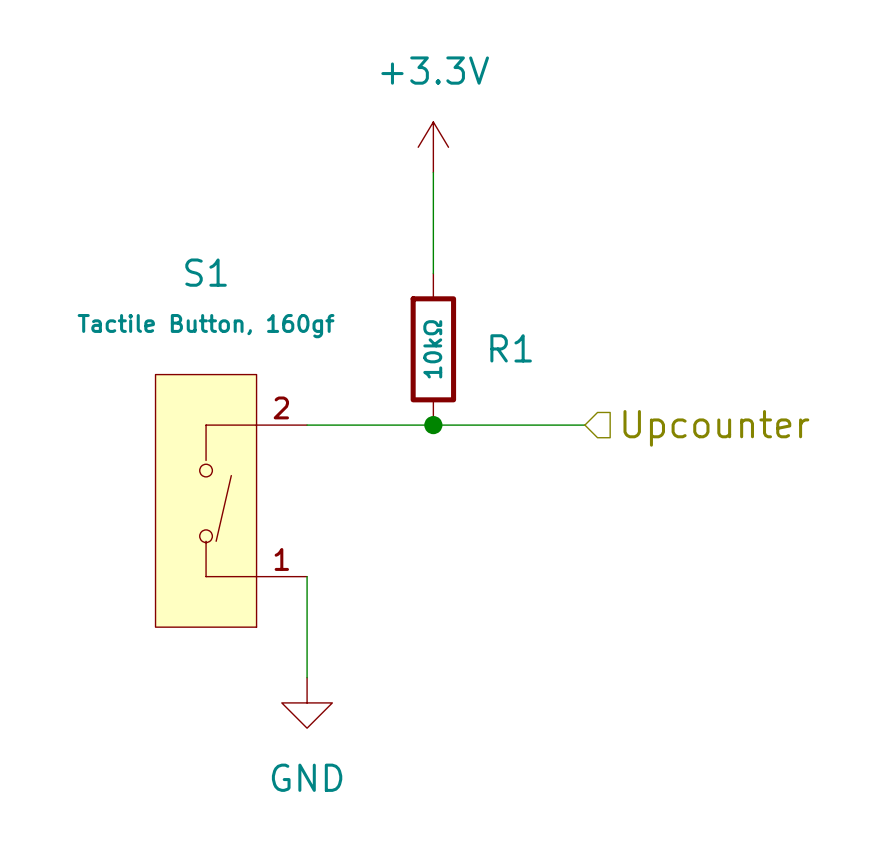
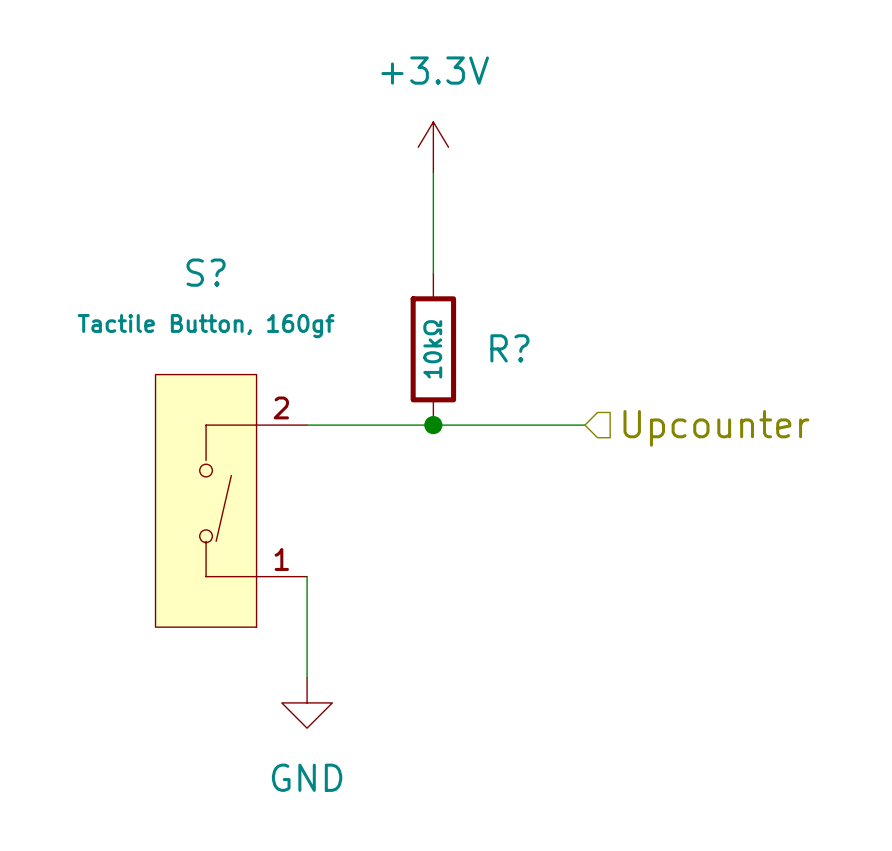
S1 name: S1 (206, 272) -> S? (206, 272)
R1 name: R1 (511, 348) -> R? (509, 348)

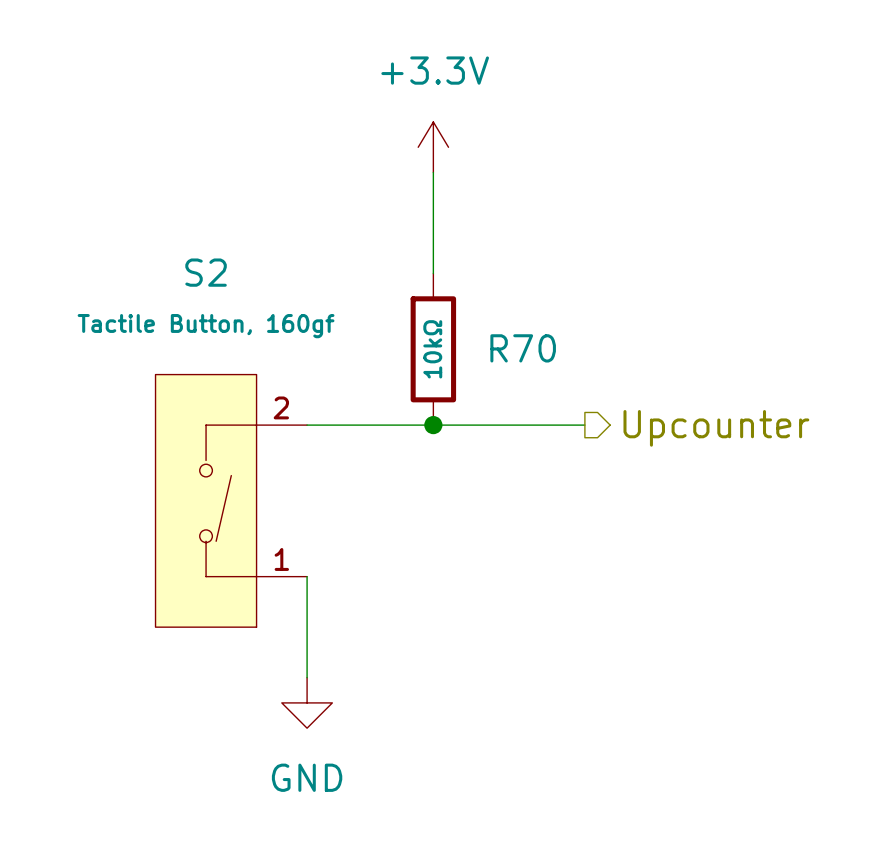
S? name: S? (206, 272) -> S2 (206, 272)
R? name: R? (509, 348) -> R70 (523, 348)
hierarchical label shape: input (716, 428) -> output (716, 428)

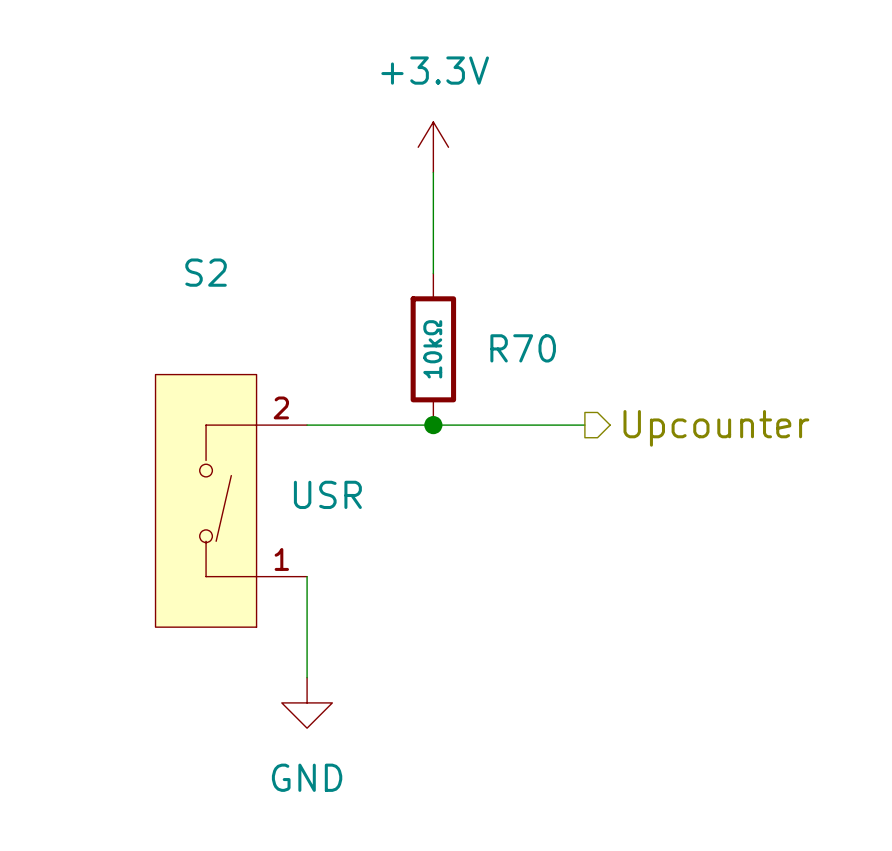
S2 value: Tactile Button, 160gf (206, 326) -> none
S2 text: none -> USR (327, 494)

